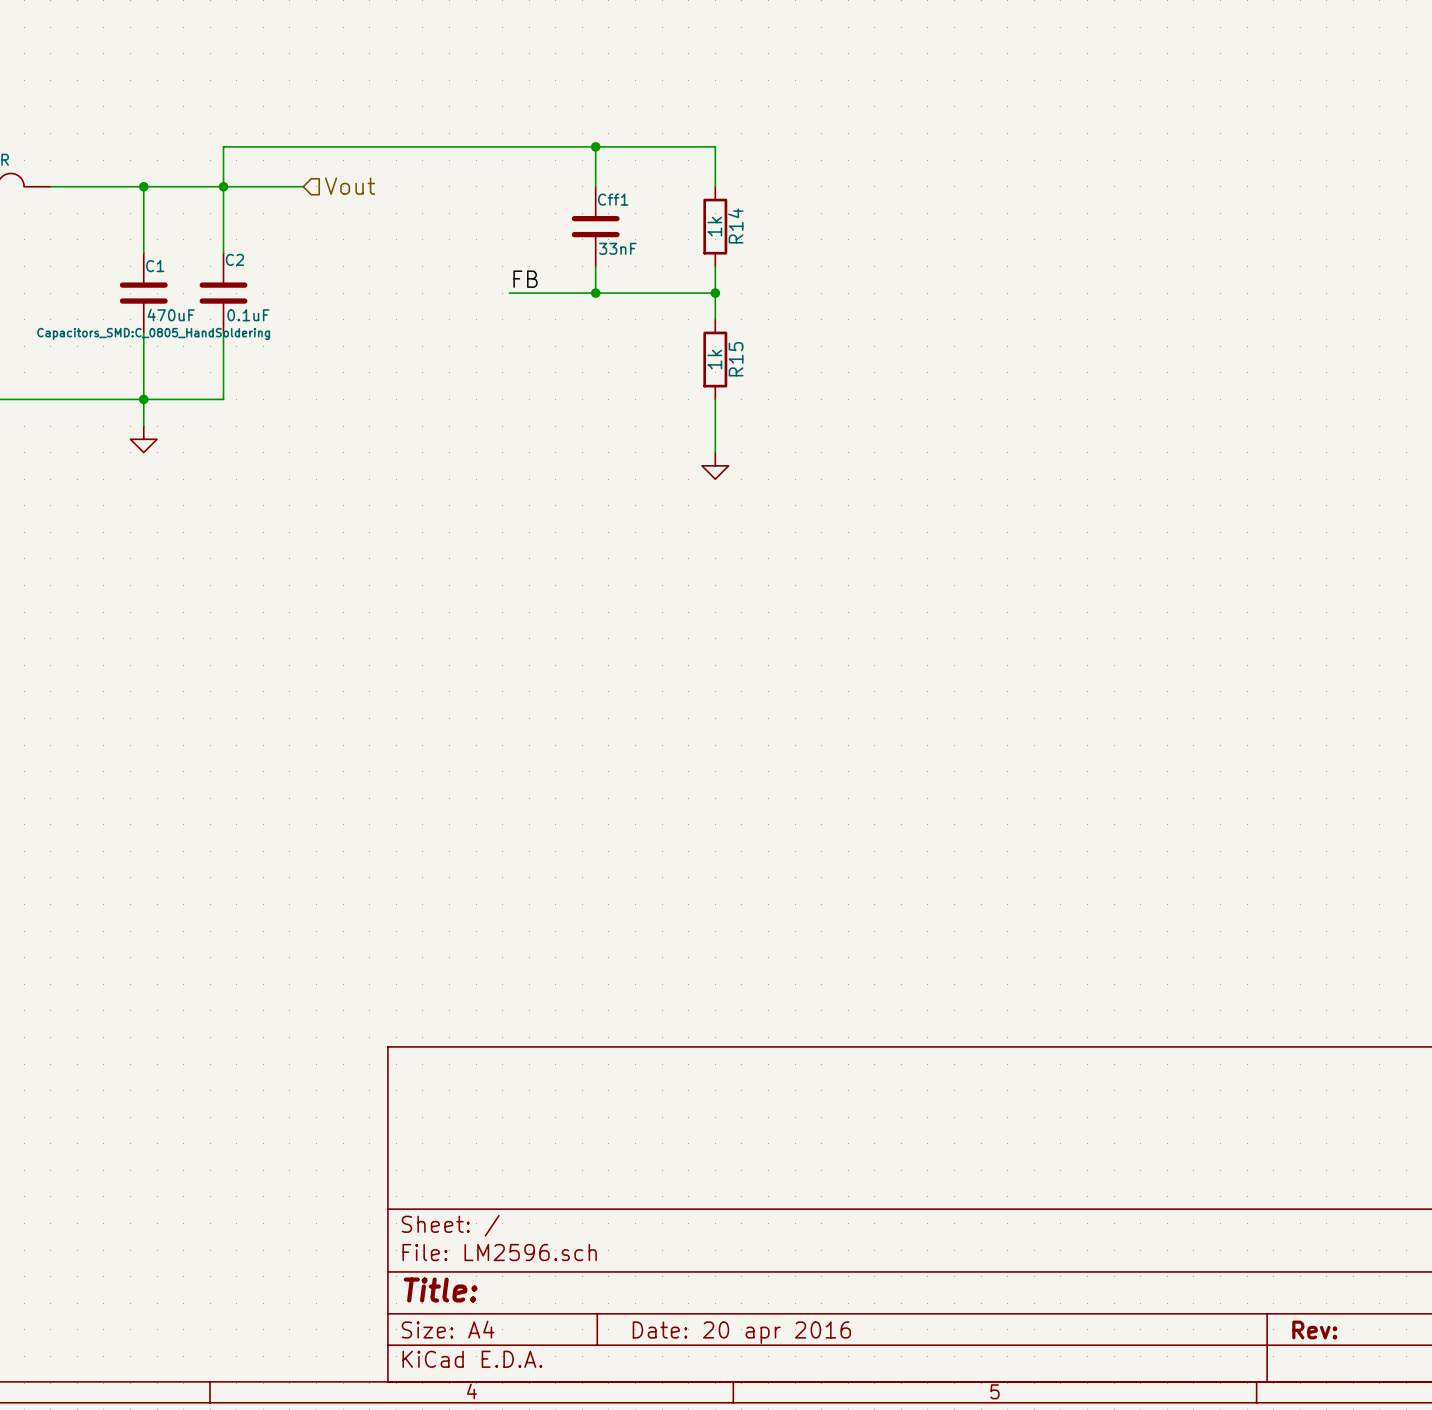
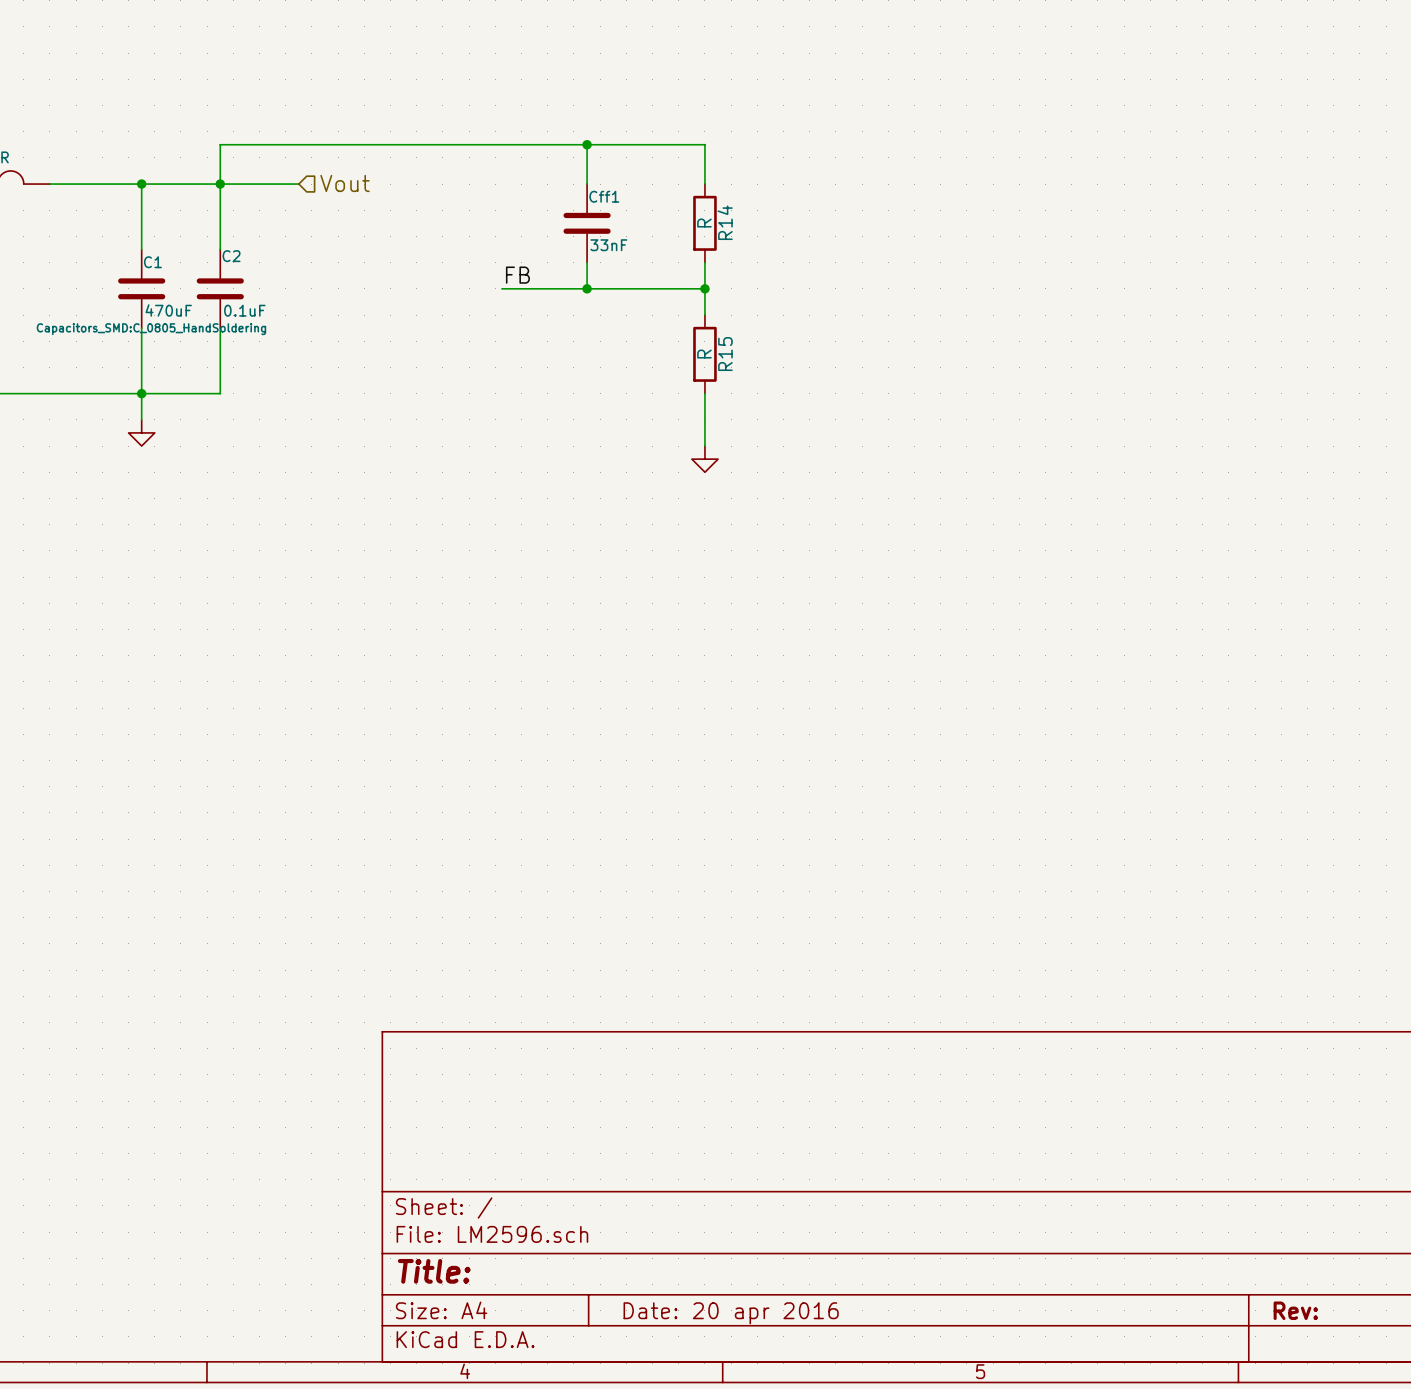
R14 value: 1k (714, 226) -> R (704, 223)
R15 value: 1k (714, 359) -> R (704, 354)

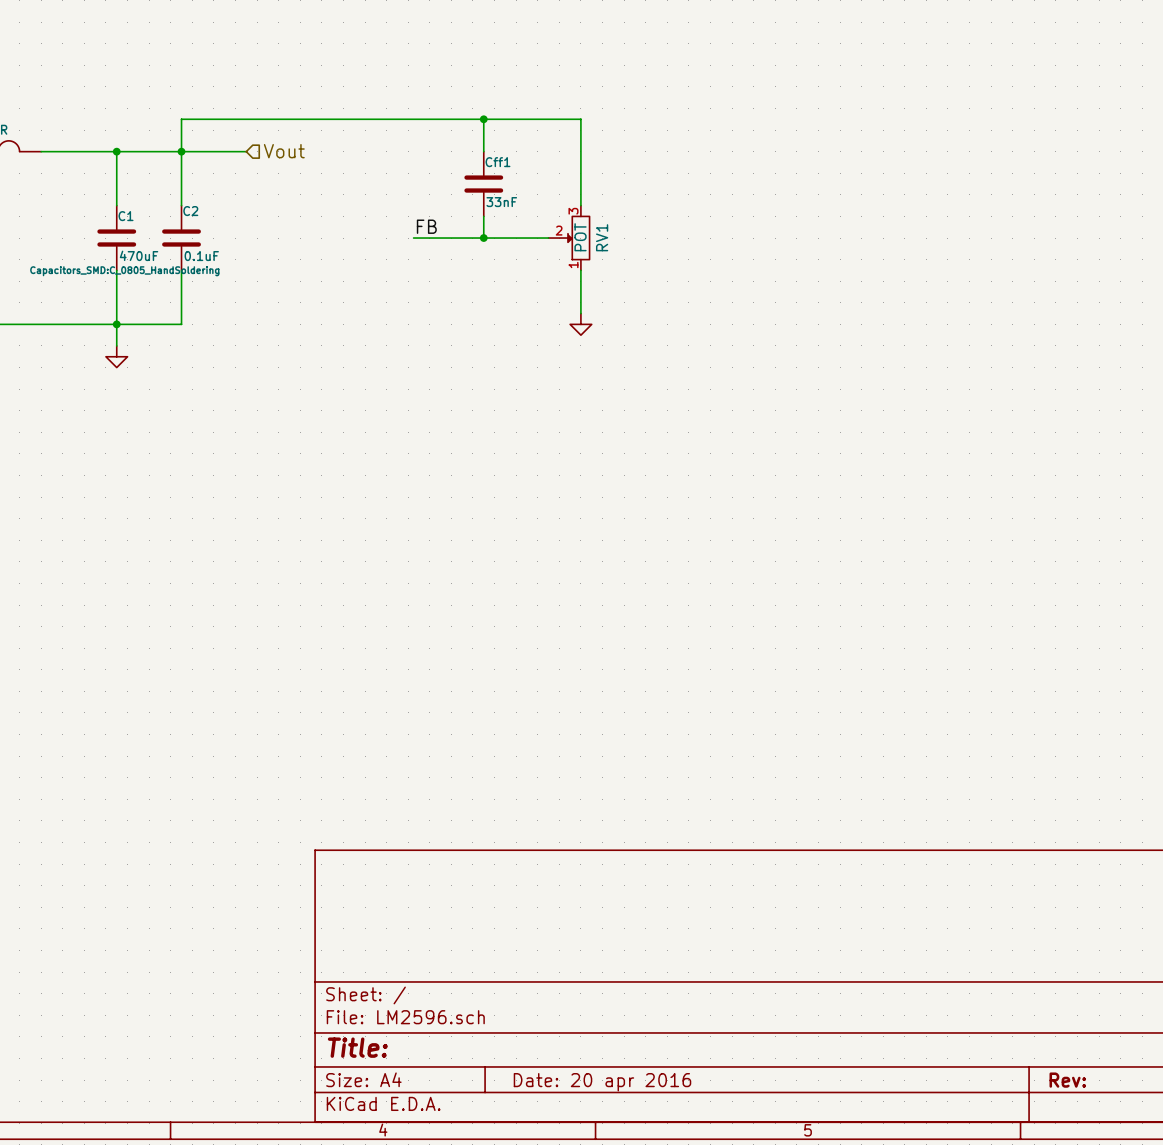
wire: none -> (580, 151) (580, 205)
R14: R (704, 223) -> none
wire: (704, 262) (704, 315) -> none
RV1: none -> POT (569, 238)
junction: (704, 288) -> none
R15: R (704, 354) -> none
wire: (704, 393) (704, 446) -> (580, 270) (580, 313)
power symbol position: (704, 459) -> (580, 324)

